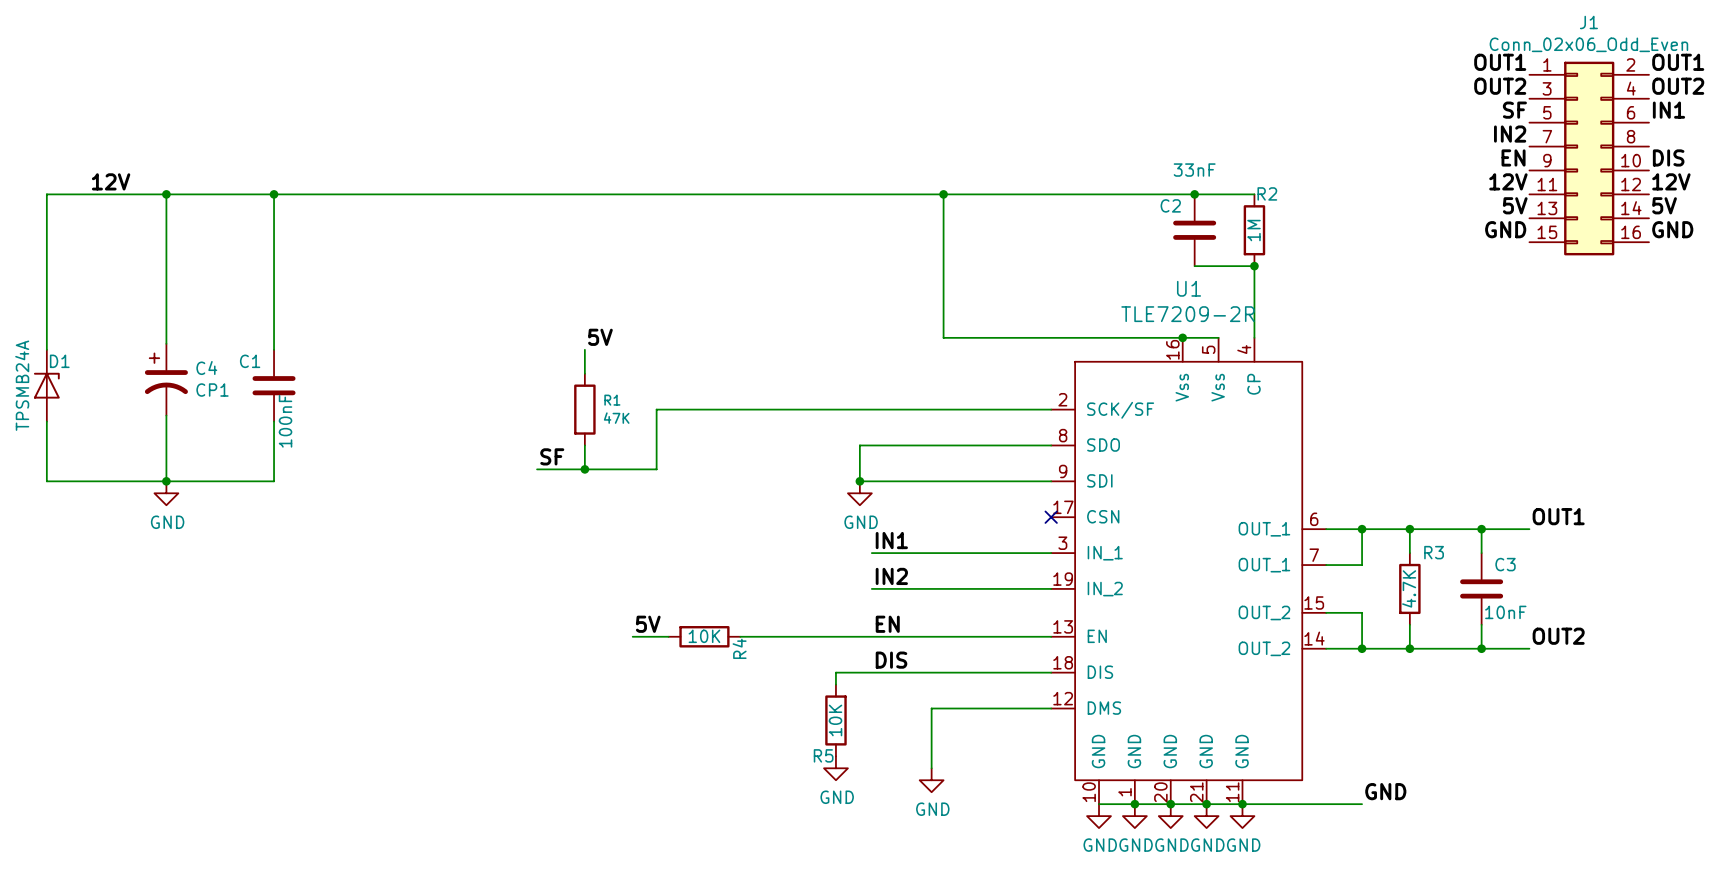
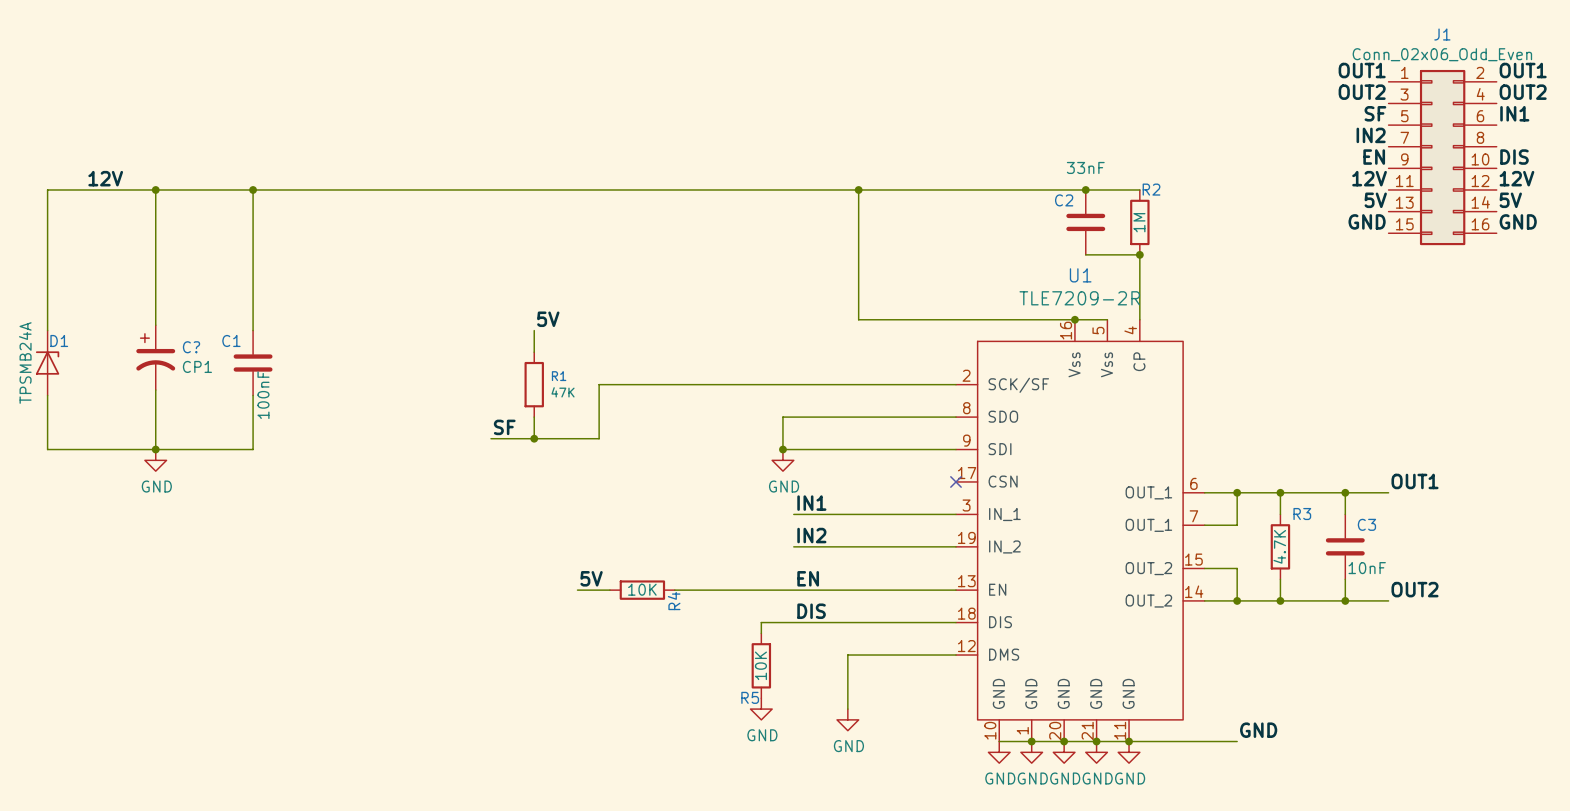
C4 name: C4 (206, 367) -> C? (191, 347)

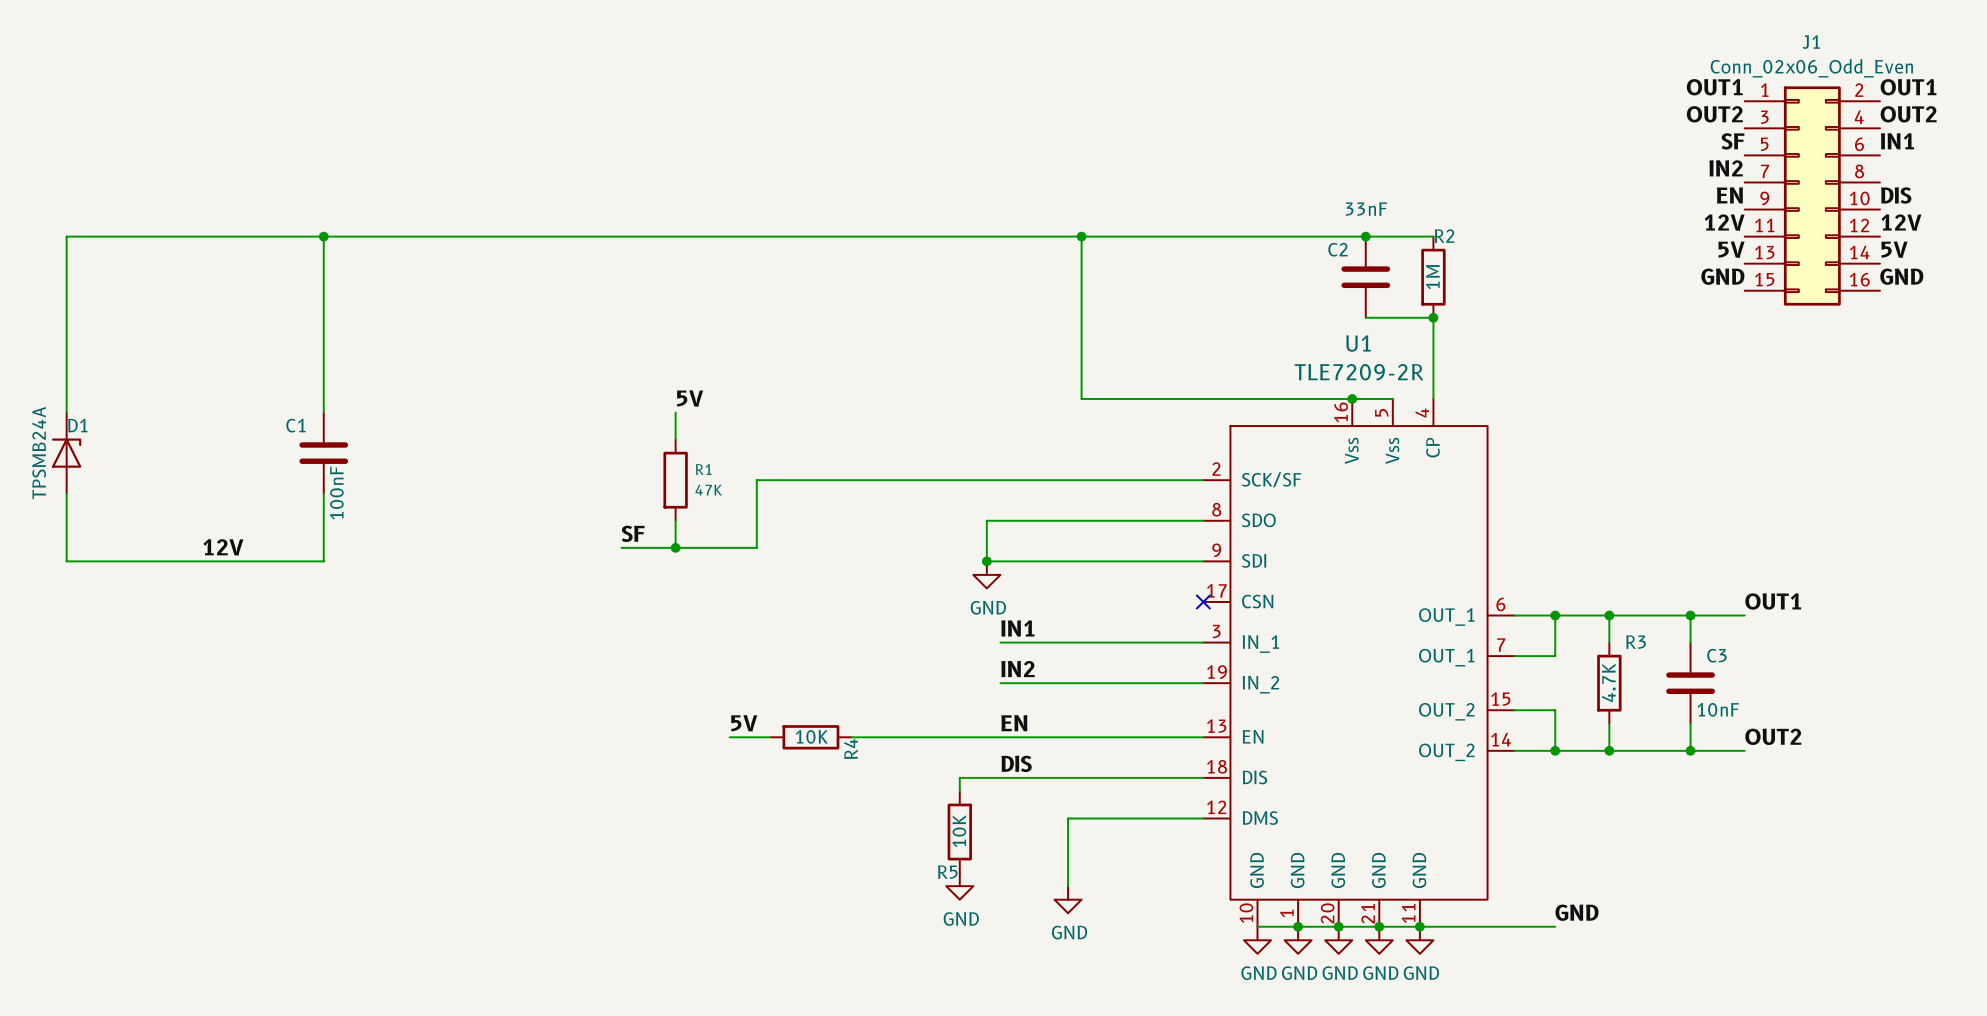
label: 12V (105, 178) -> none
wire: (155, 189) (155, 325) -> none
junction: (155, 189) -> none
C?: CP1 (155, 357) -> none
wire: (155, 390) (155, 449) -> none
label: none -> 12V (223, 547)
junction: (155, 449) -> none
power symbol: GND (155, 460) -> none

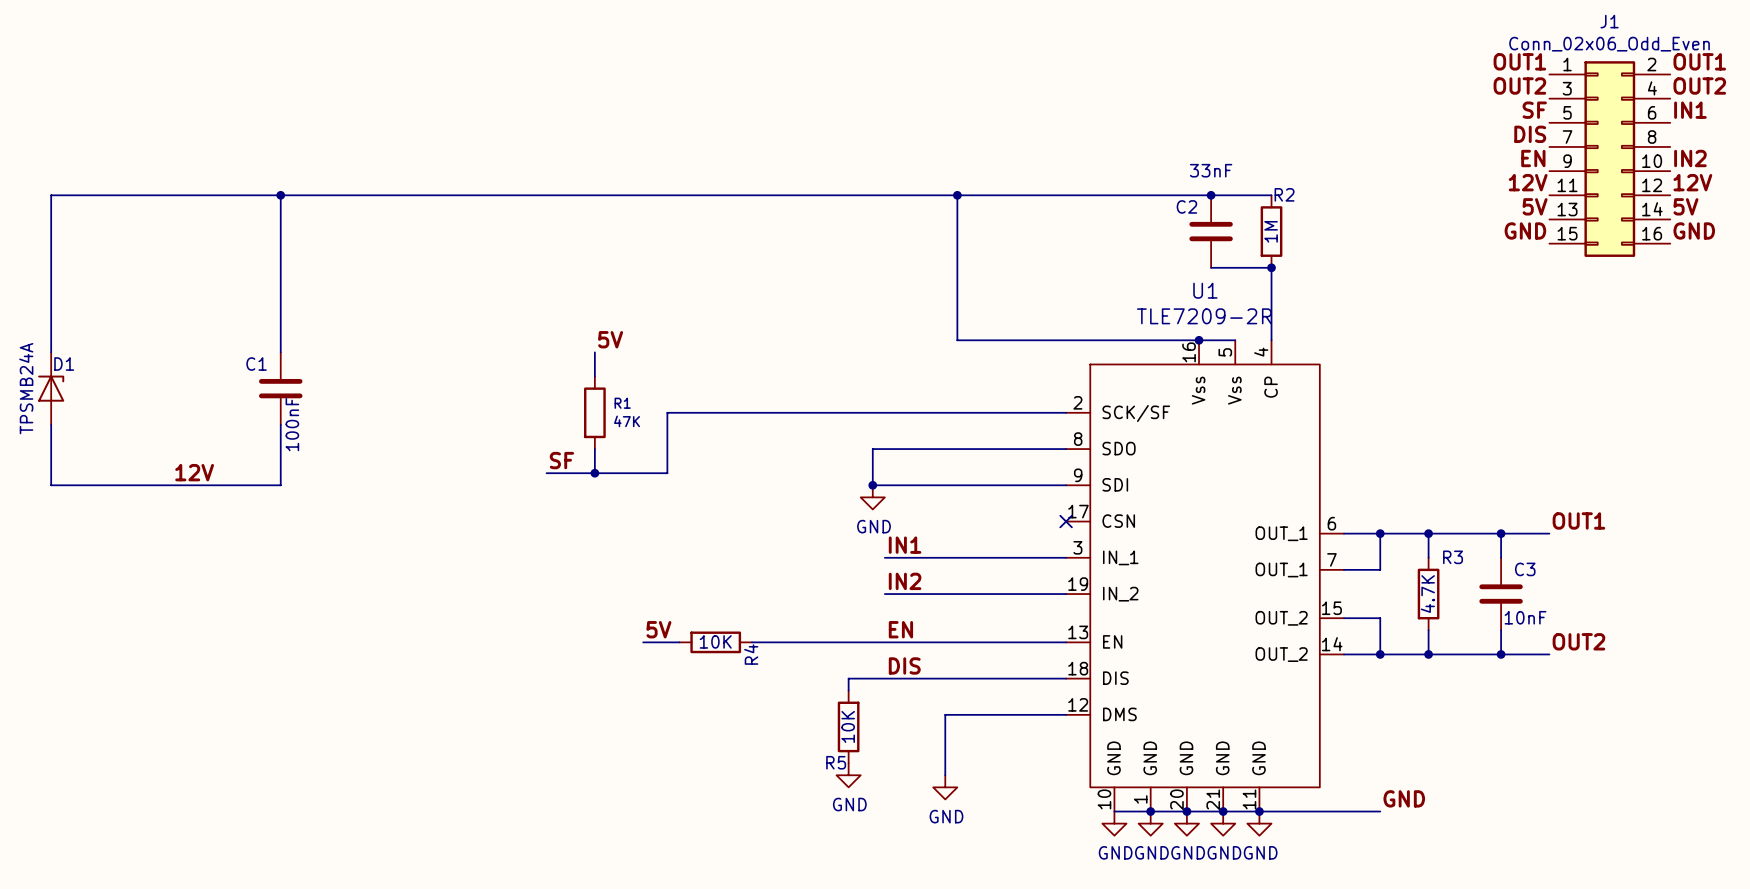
label: IN2 (1726, 168) -> DIS (1530, 134)
label: DIS (1896, 195) -> IN2 (1690, 158)

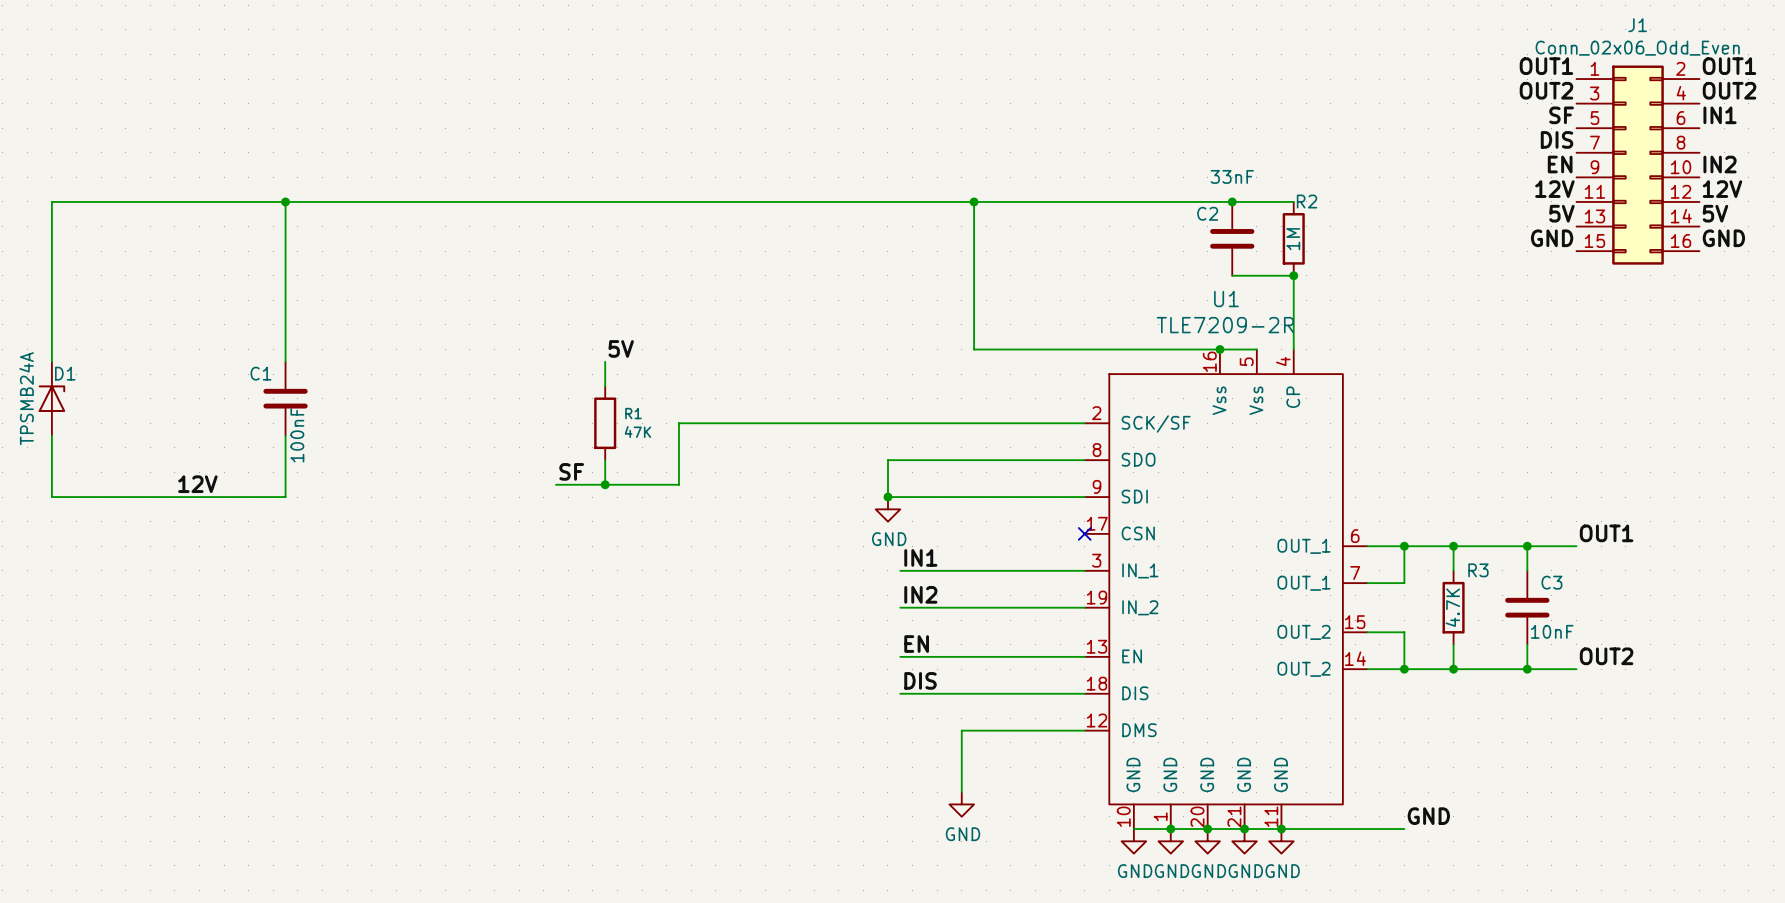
label: 5V (658, 629) -> none
wire: (643, 642) (679, 642) -> none
R4: 10K (715, 642) -> none
wire: (751, 642) (884, 642) -> none
wire: (884, 678) (848, 678) (848, 690) -> none
R5: 10K (848, 726) -> none
power symbol: GND (848, 775) -> none

